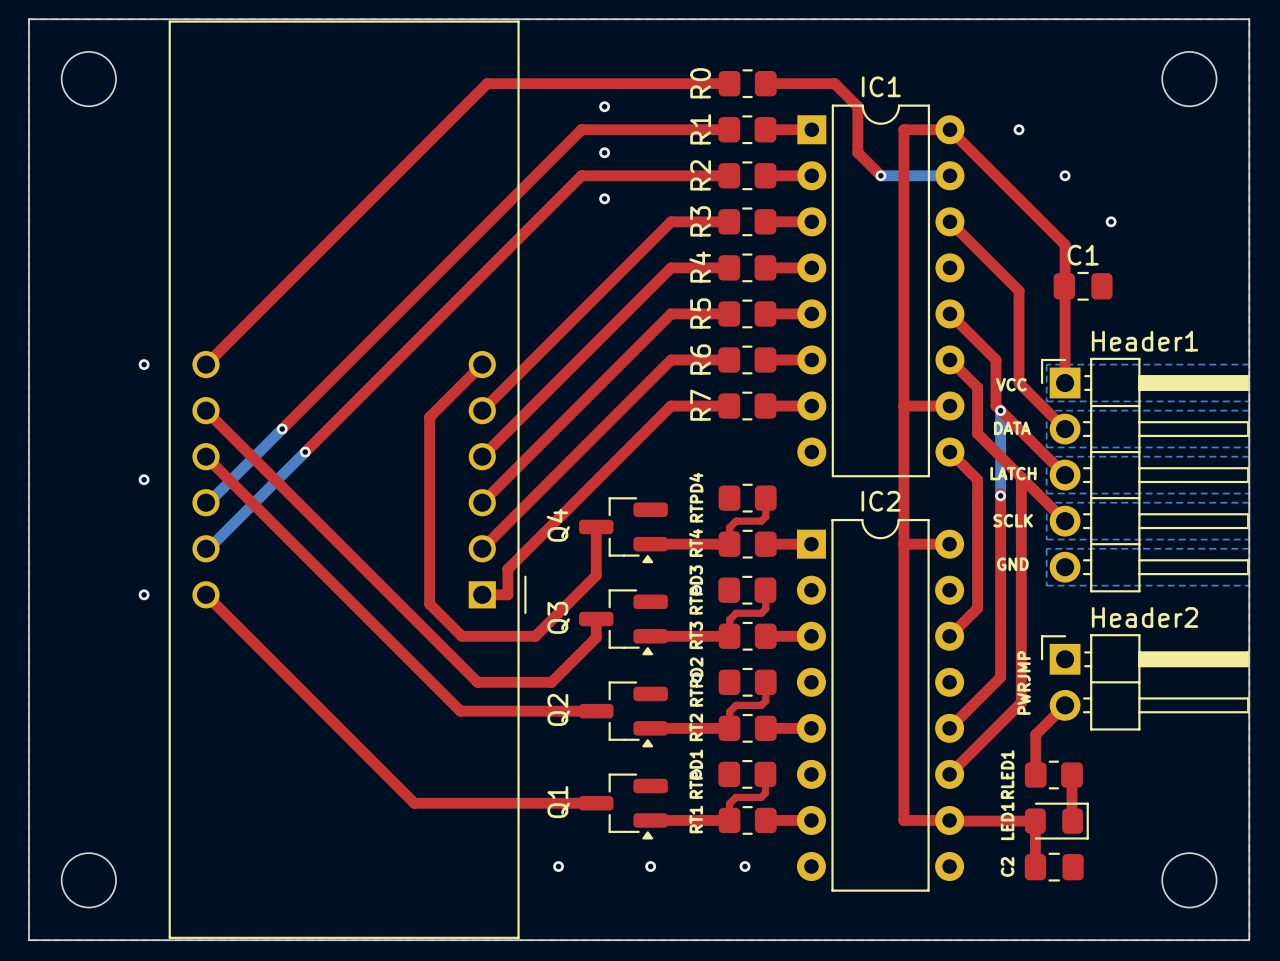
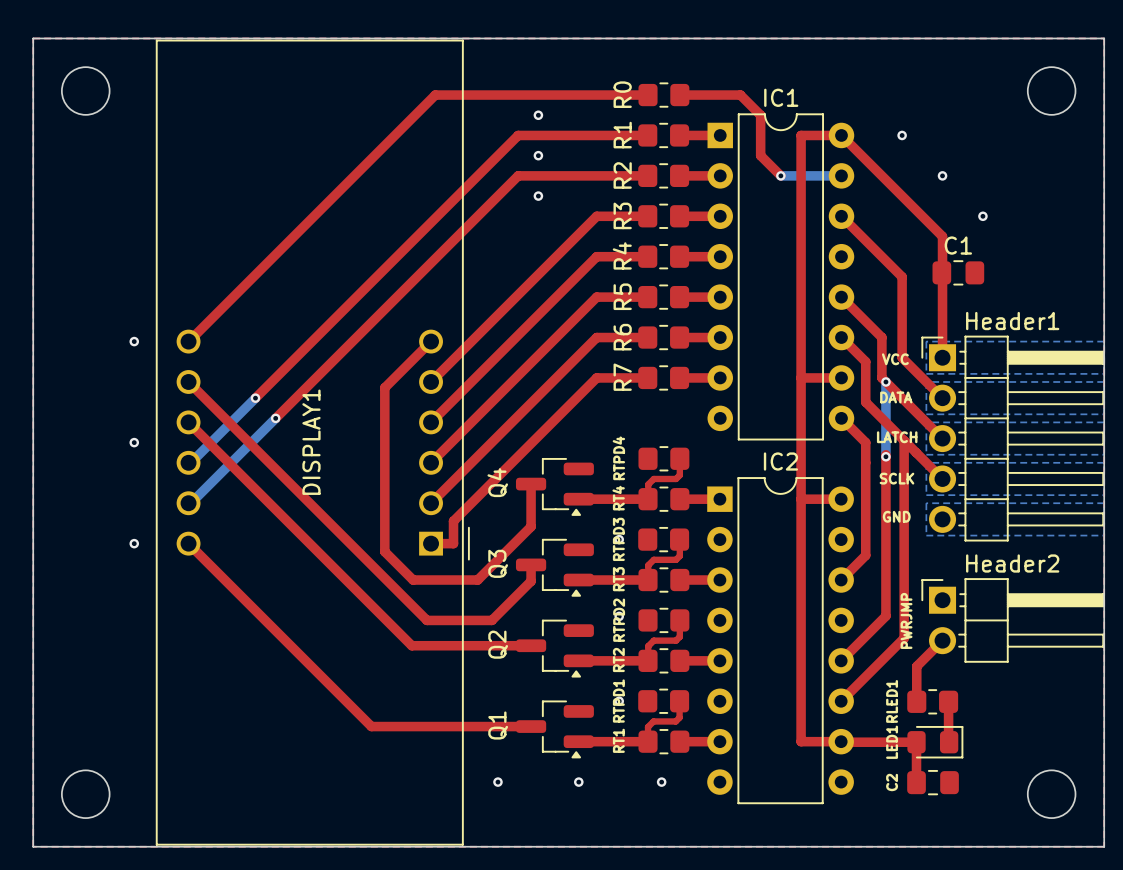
DISPLAY1 name: none -> DISPLAY1 (311, 442)

